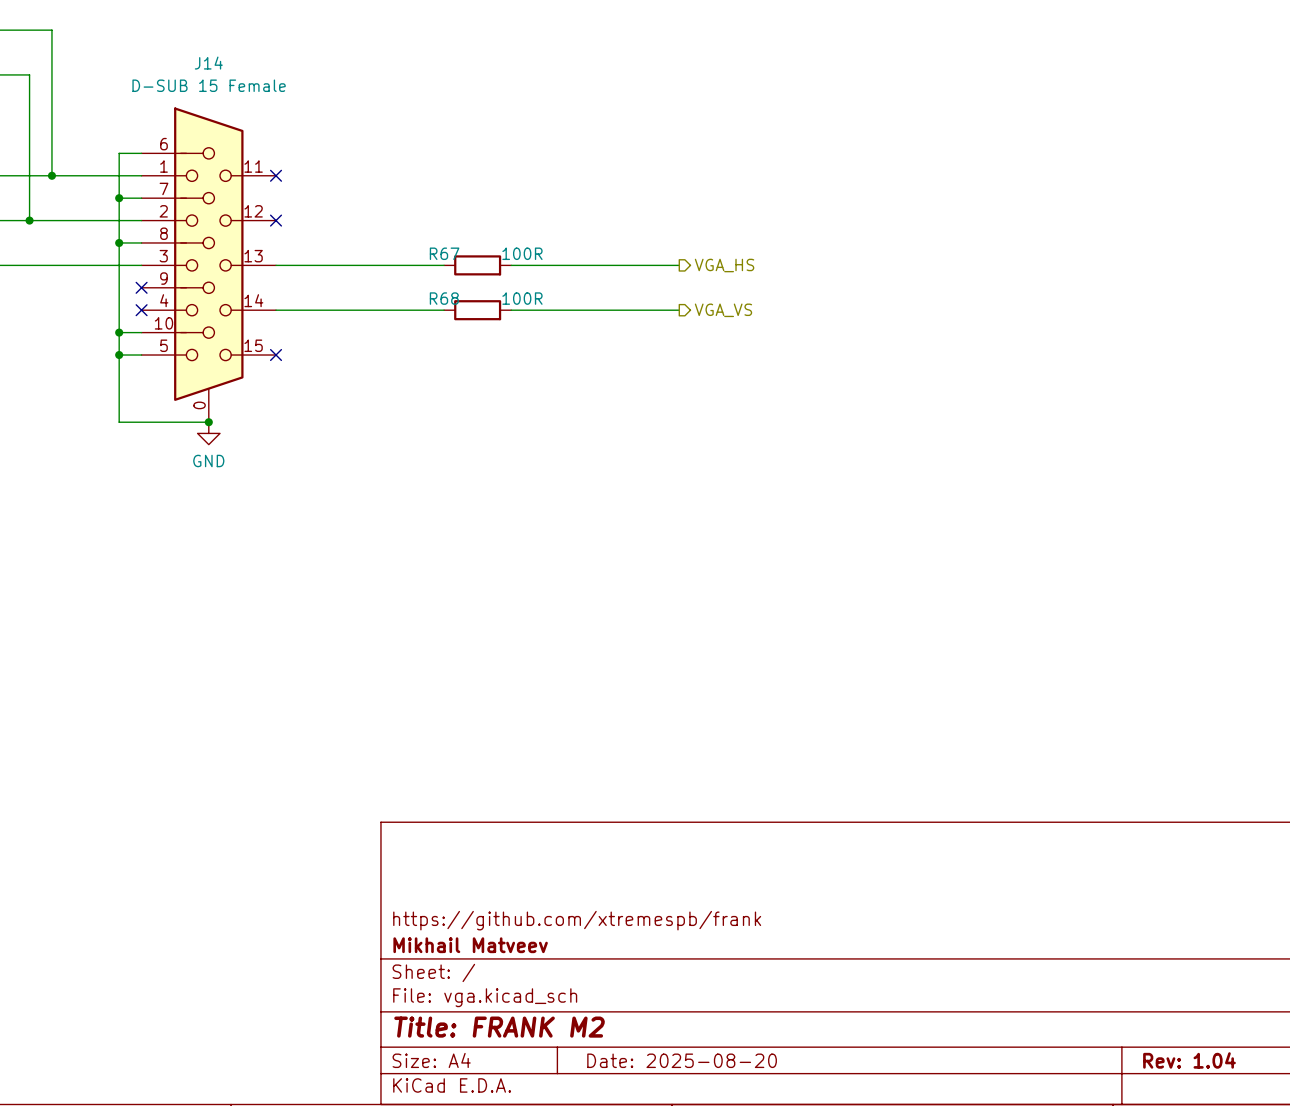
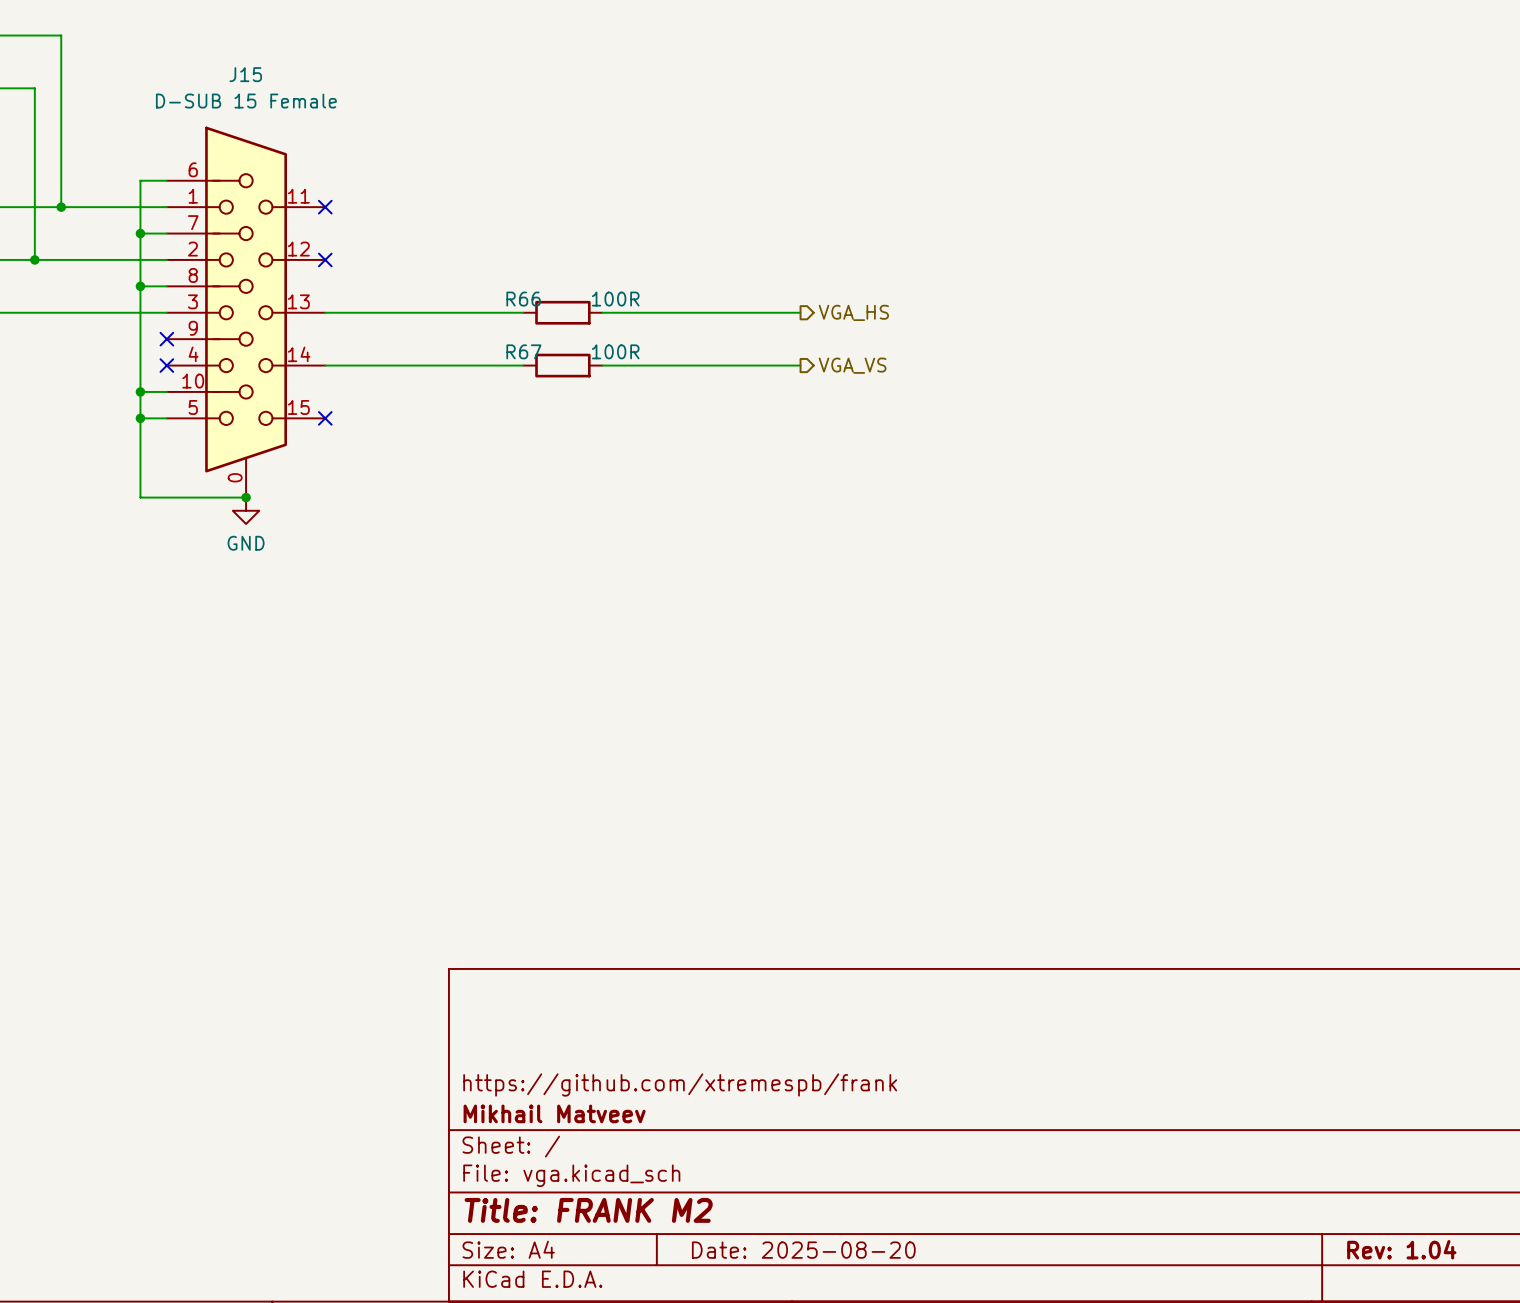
J14 name: J14 (208, 63) -> J15 (245, 74)
R67 name: R67 (444, 253) -> R66 (523, 299)
R68 name: R68 (444, 298) -> R67 (523, 351)

